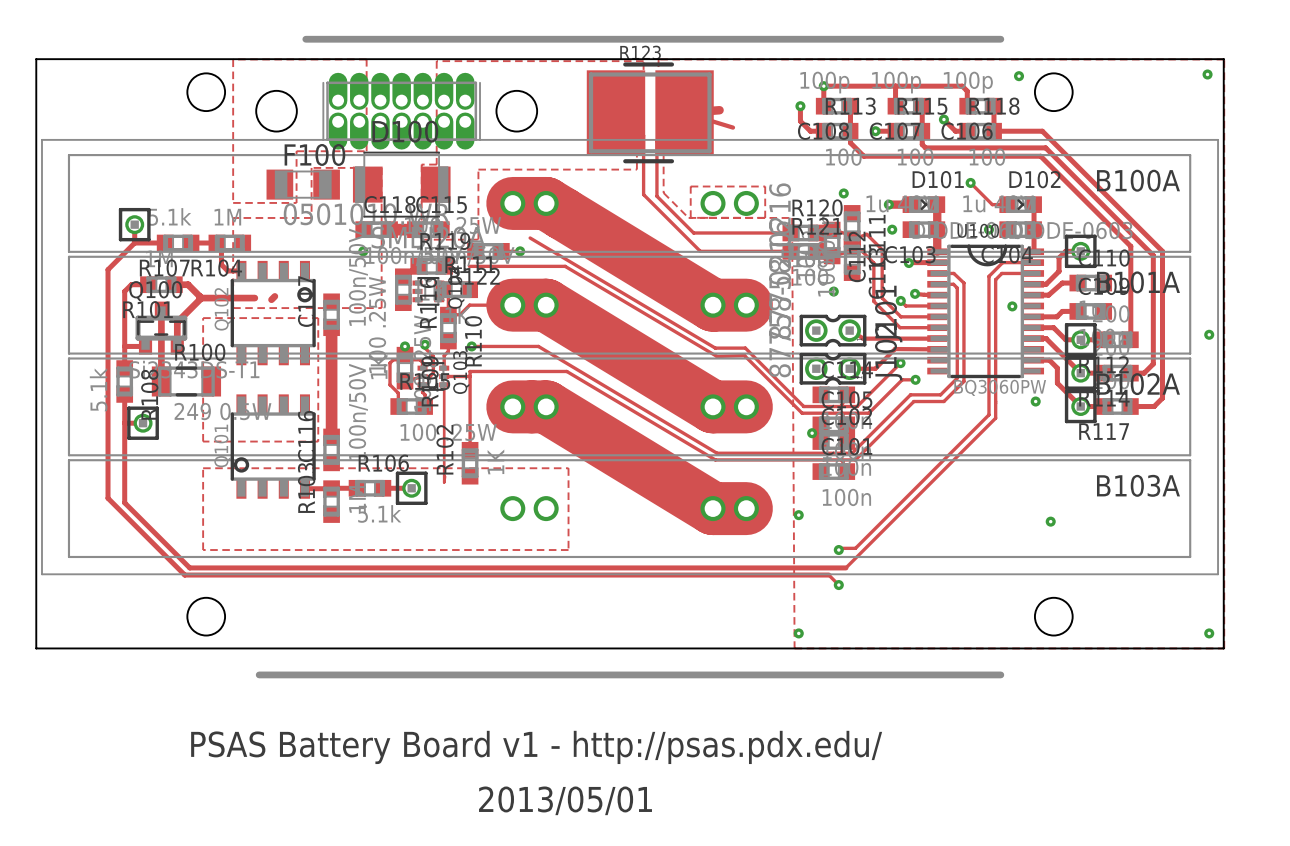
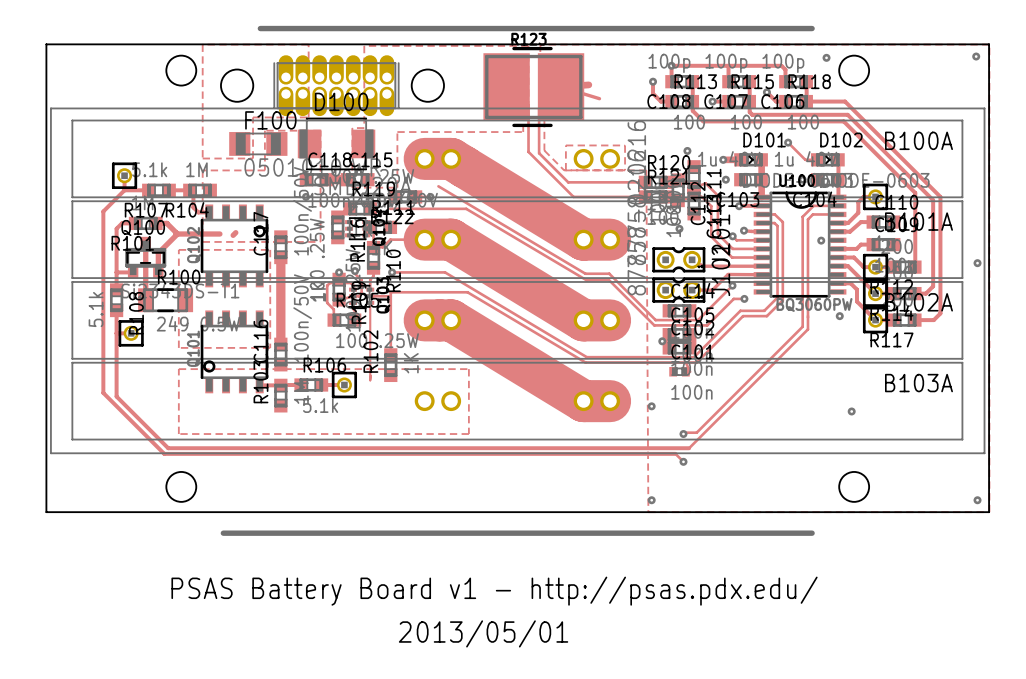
C101 footprint: [812, 463, 856, 480] -> [669, 366, 690, 377]

